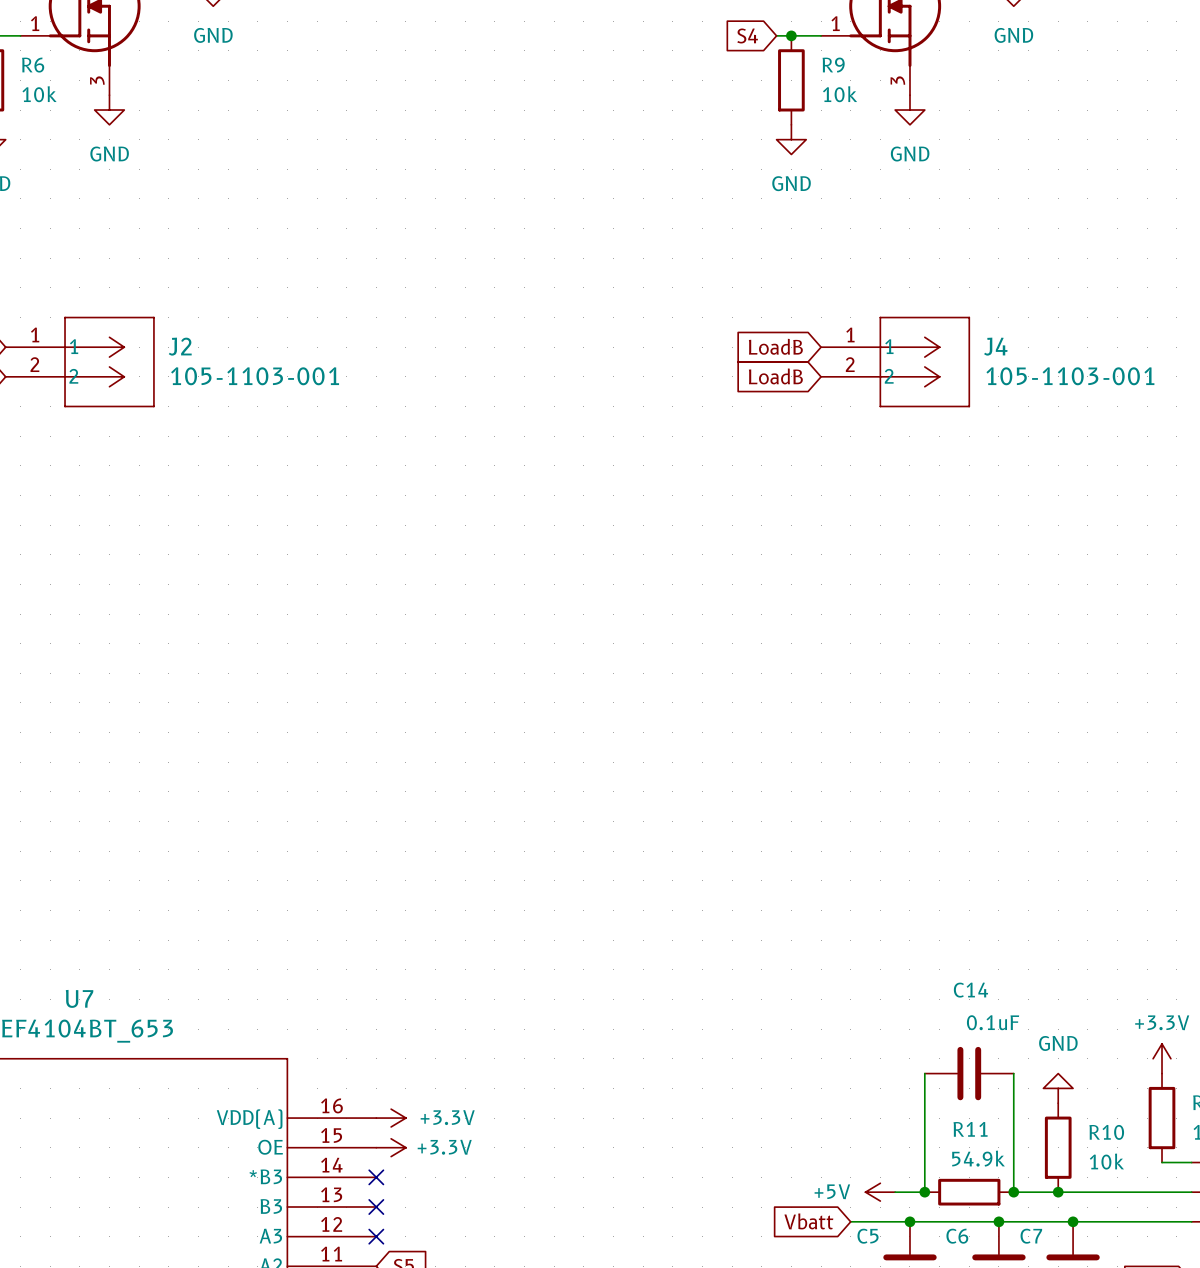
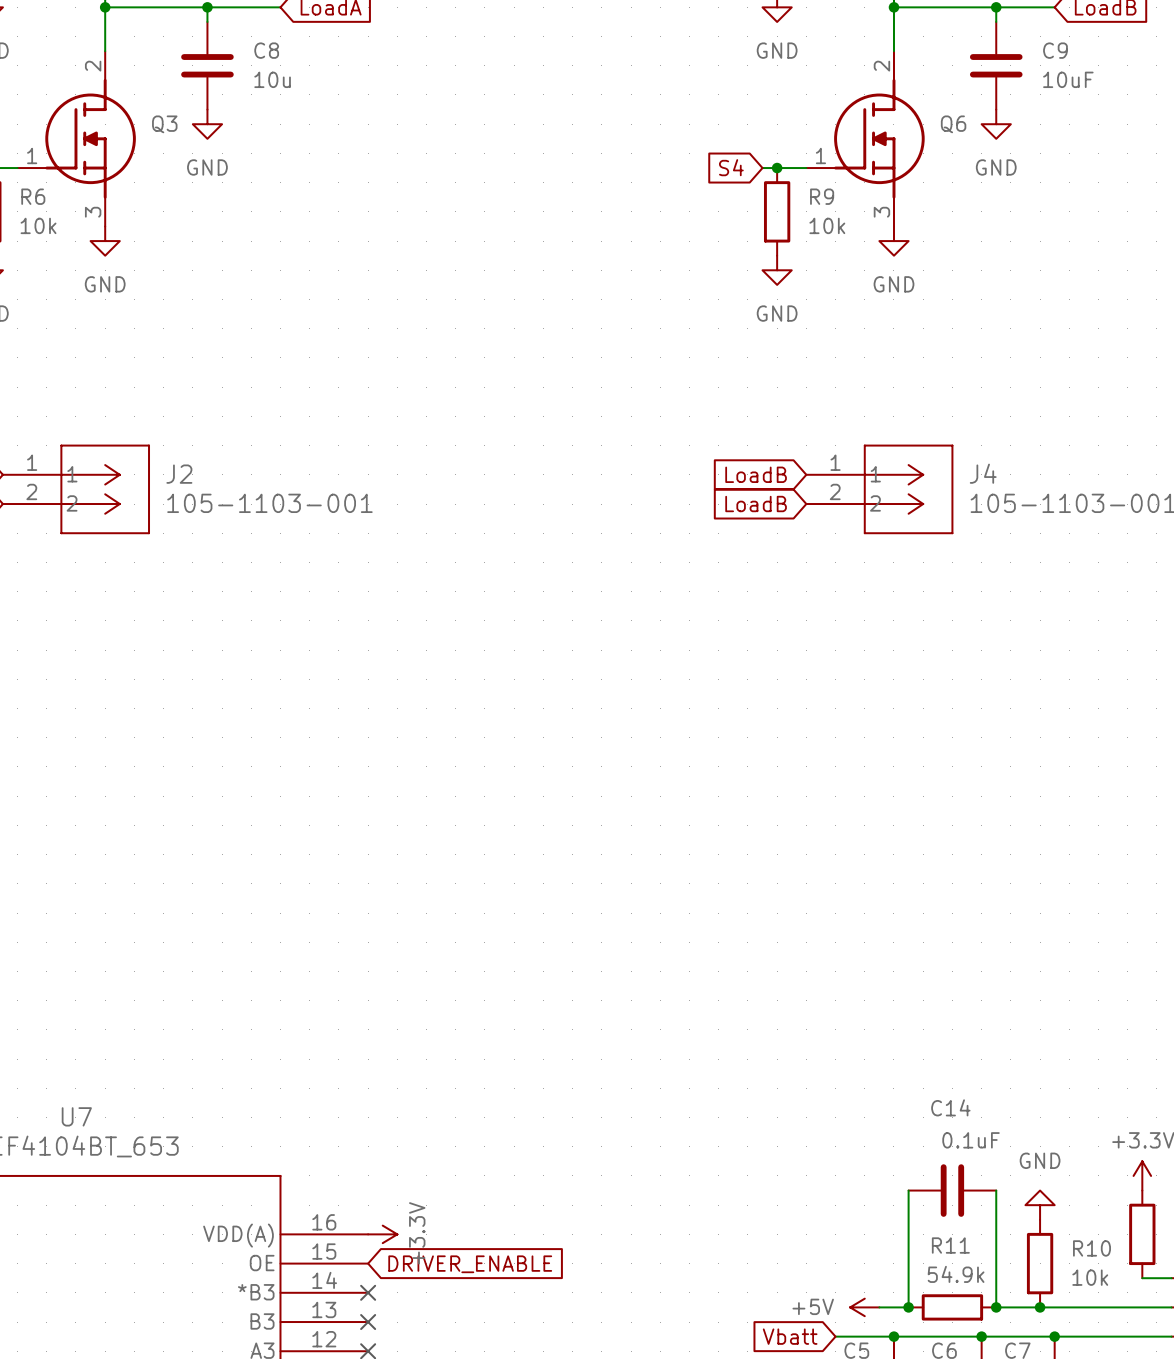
power symbol text rotation: 0° (447, 1117) -> 90° counterclockwise (417, 1233)
power symbol: +3.3V (391, 1147) -> none
global label: none -> DRIVER_ENABLE (470, 1264)

